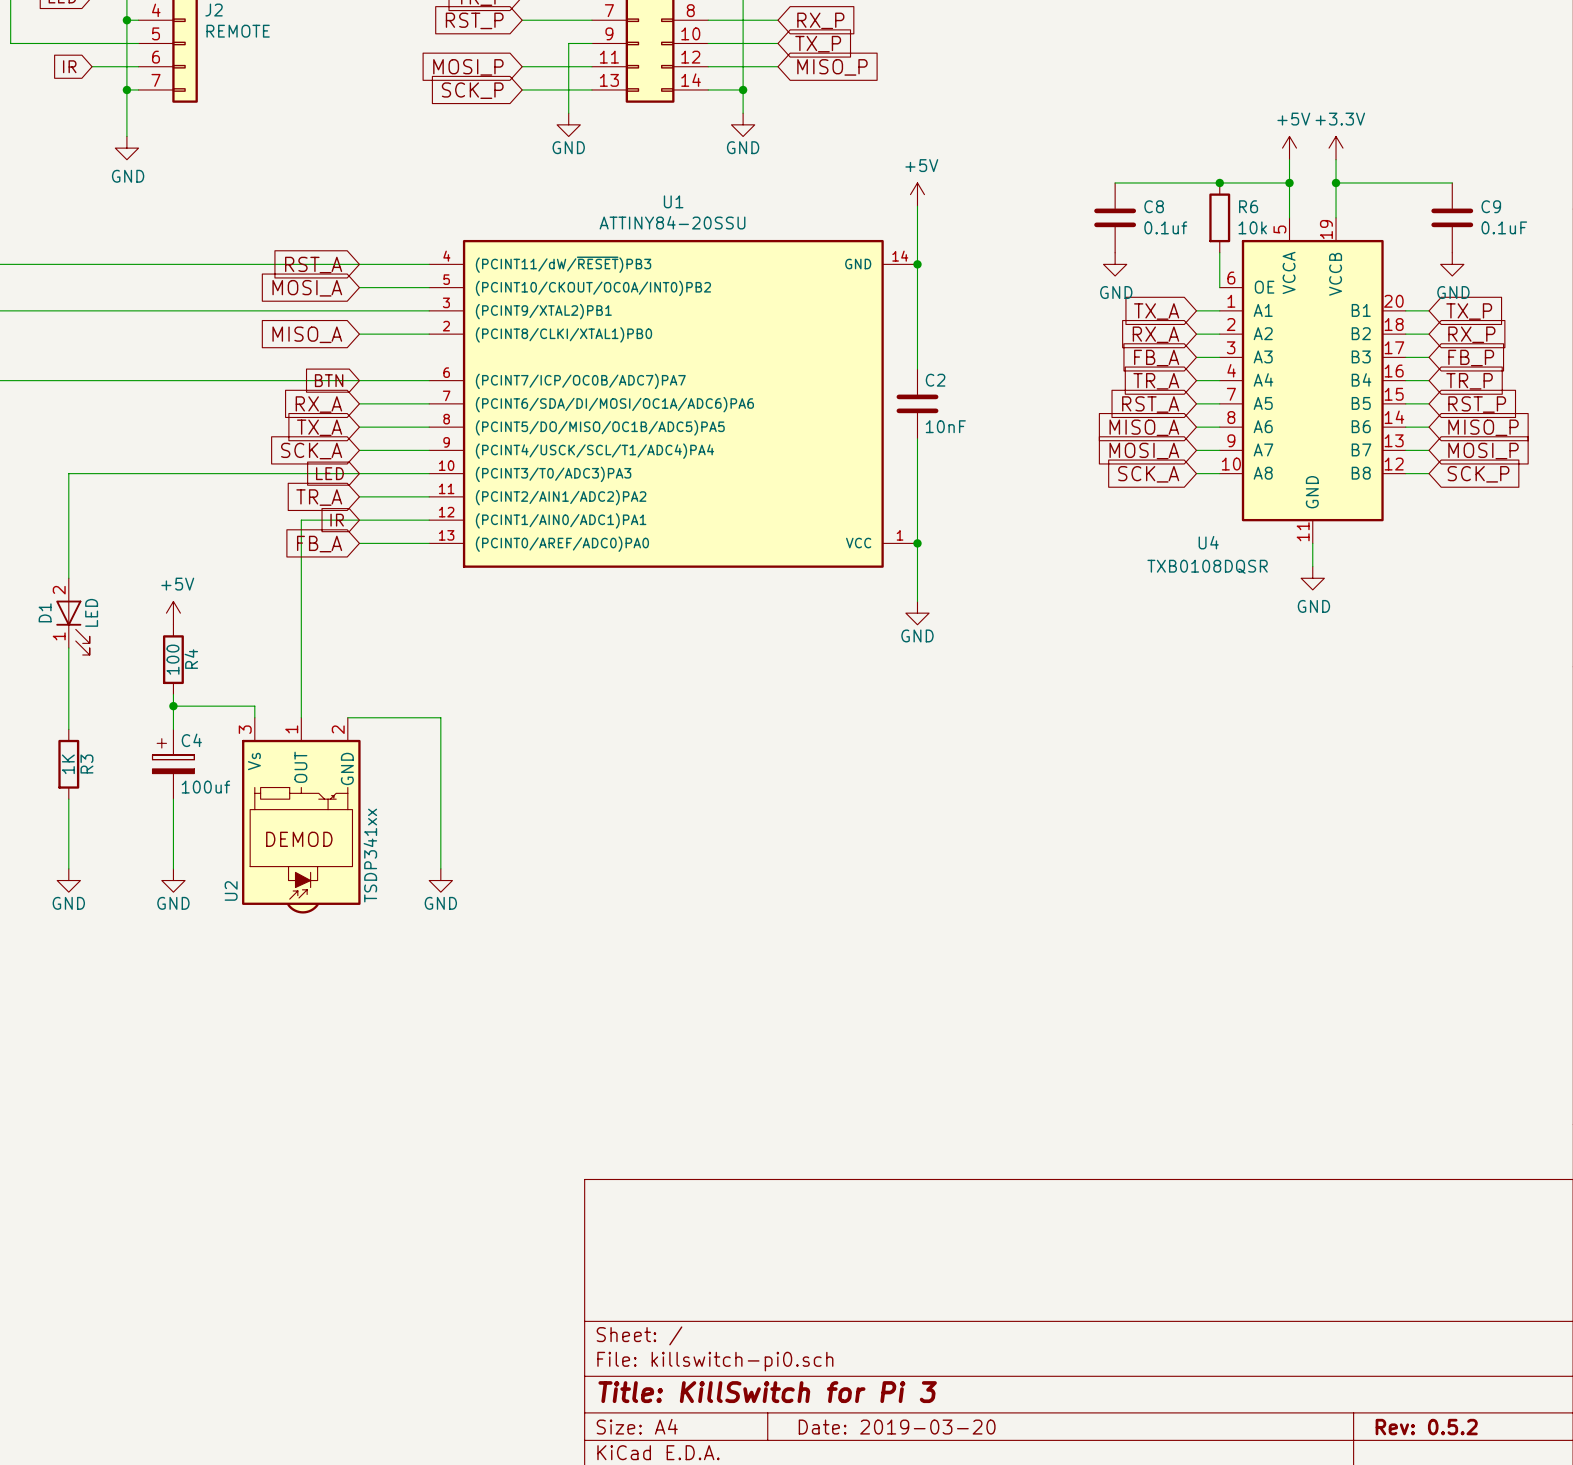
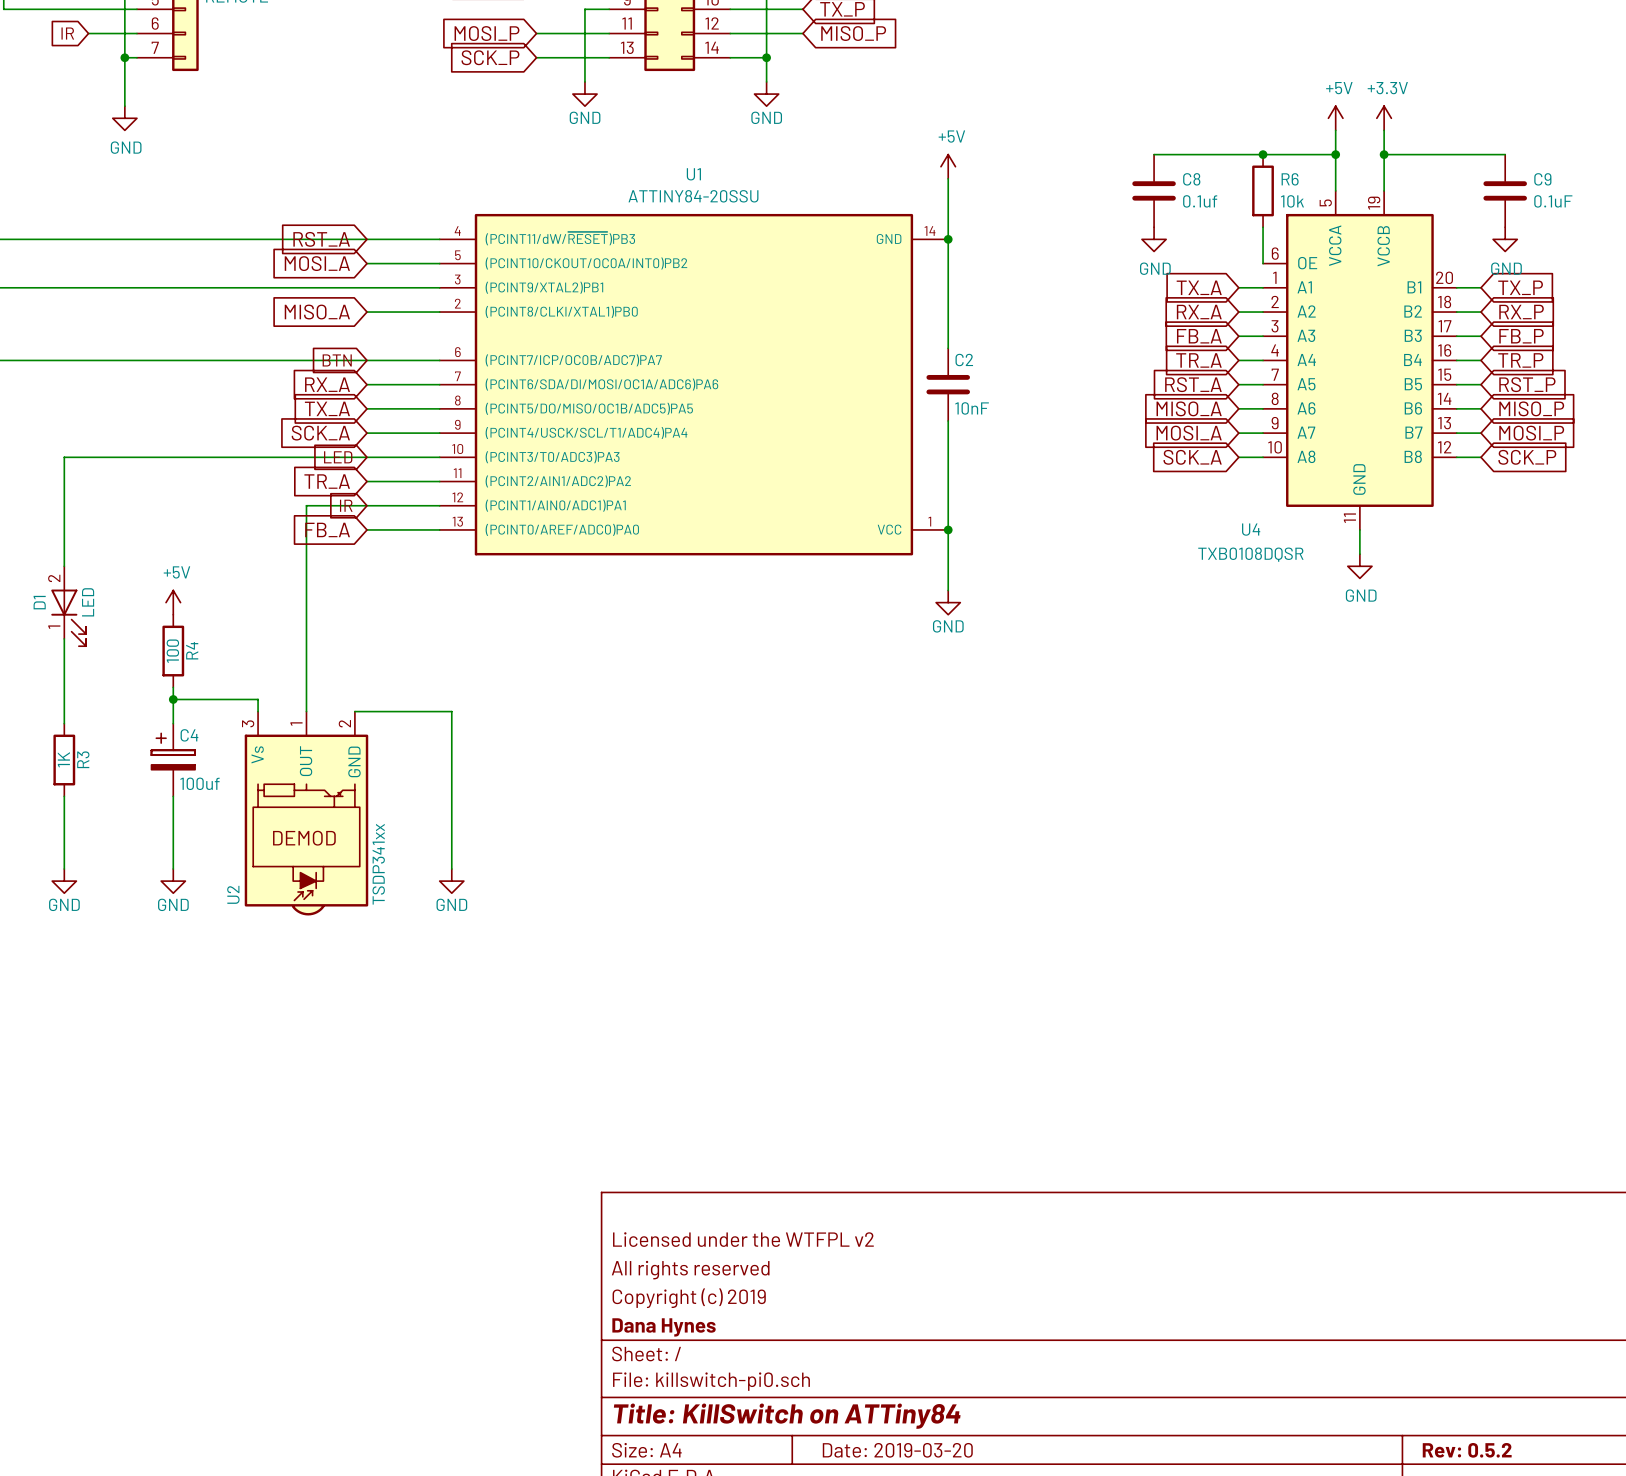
title block: none -> Licensed under the WTFPL v2 (743, 1239)
title block: none -> All rights reserved (690, 1270)
title block: none -> Copyright (c) 2019 (689, 1298)
title block: none -> Dana Hynes (664, 1327)
title block: Title: KillSwitch for Pi 3 (767, 1392) -> Title: KillSwitch on ATTiny84 (787, 1416)

